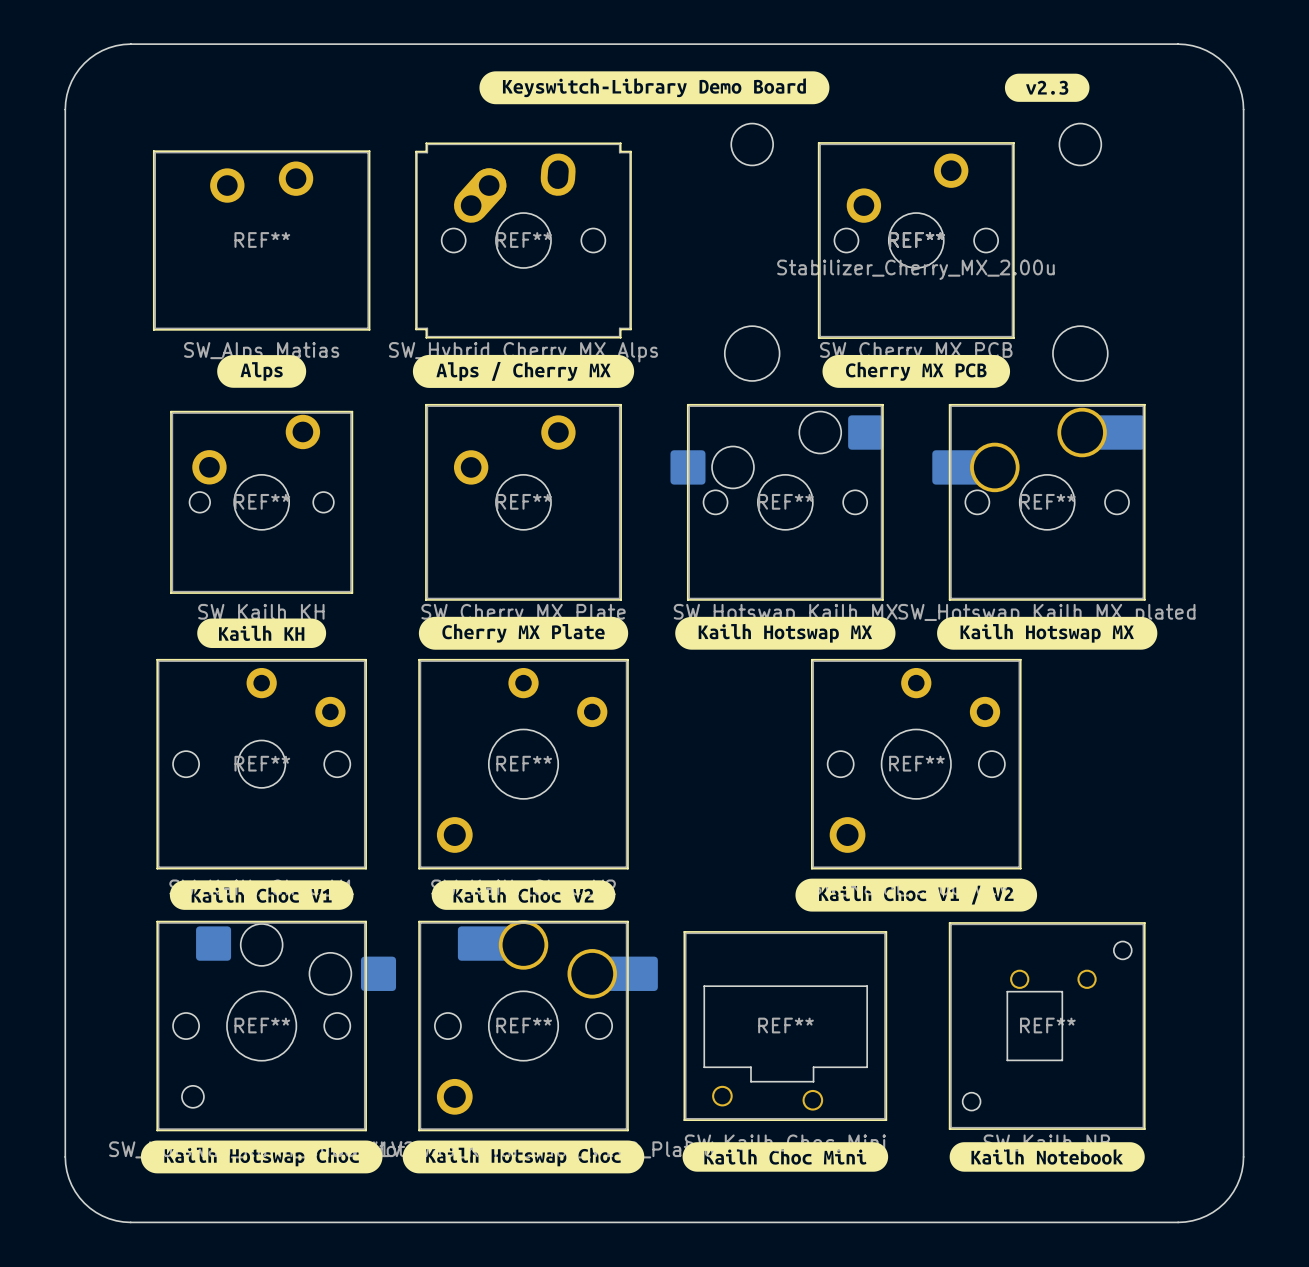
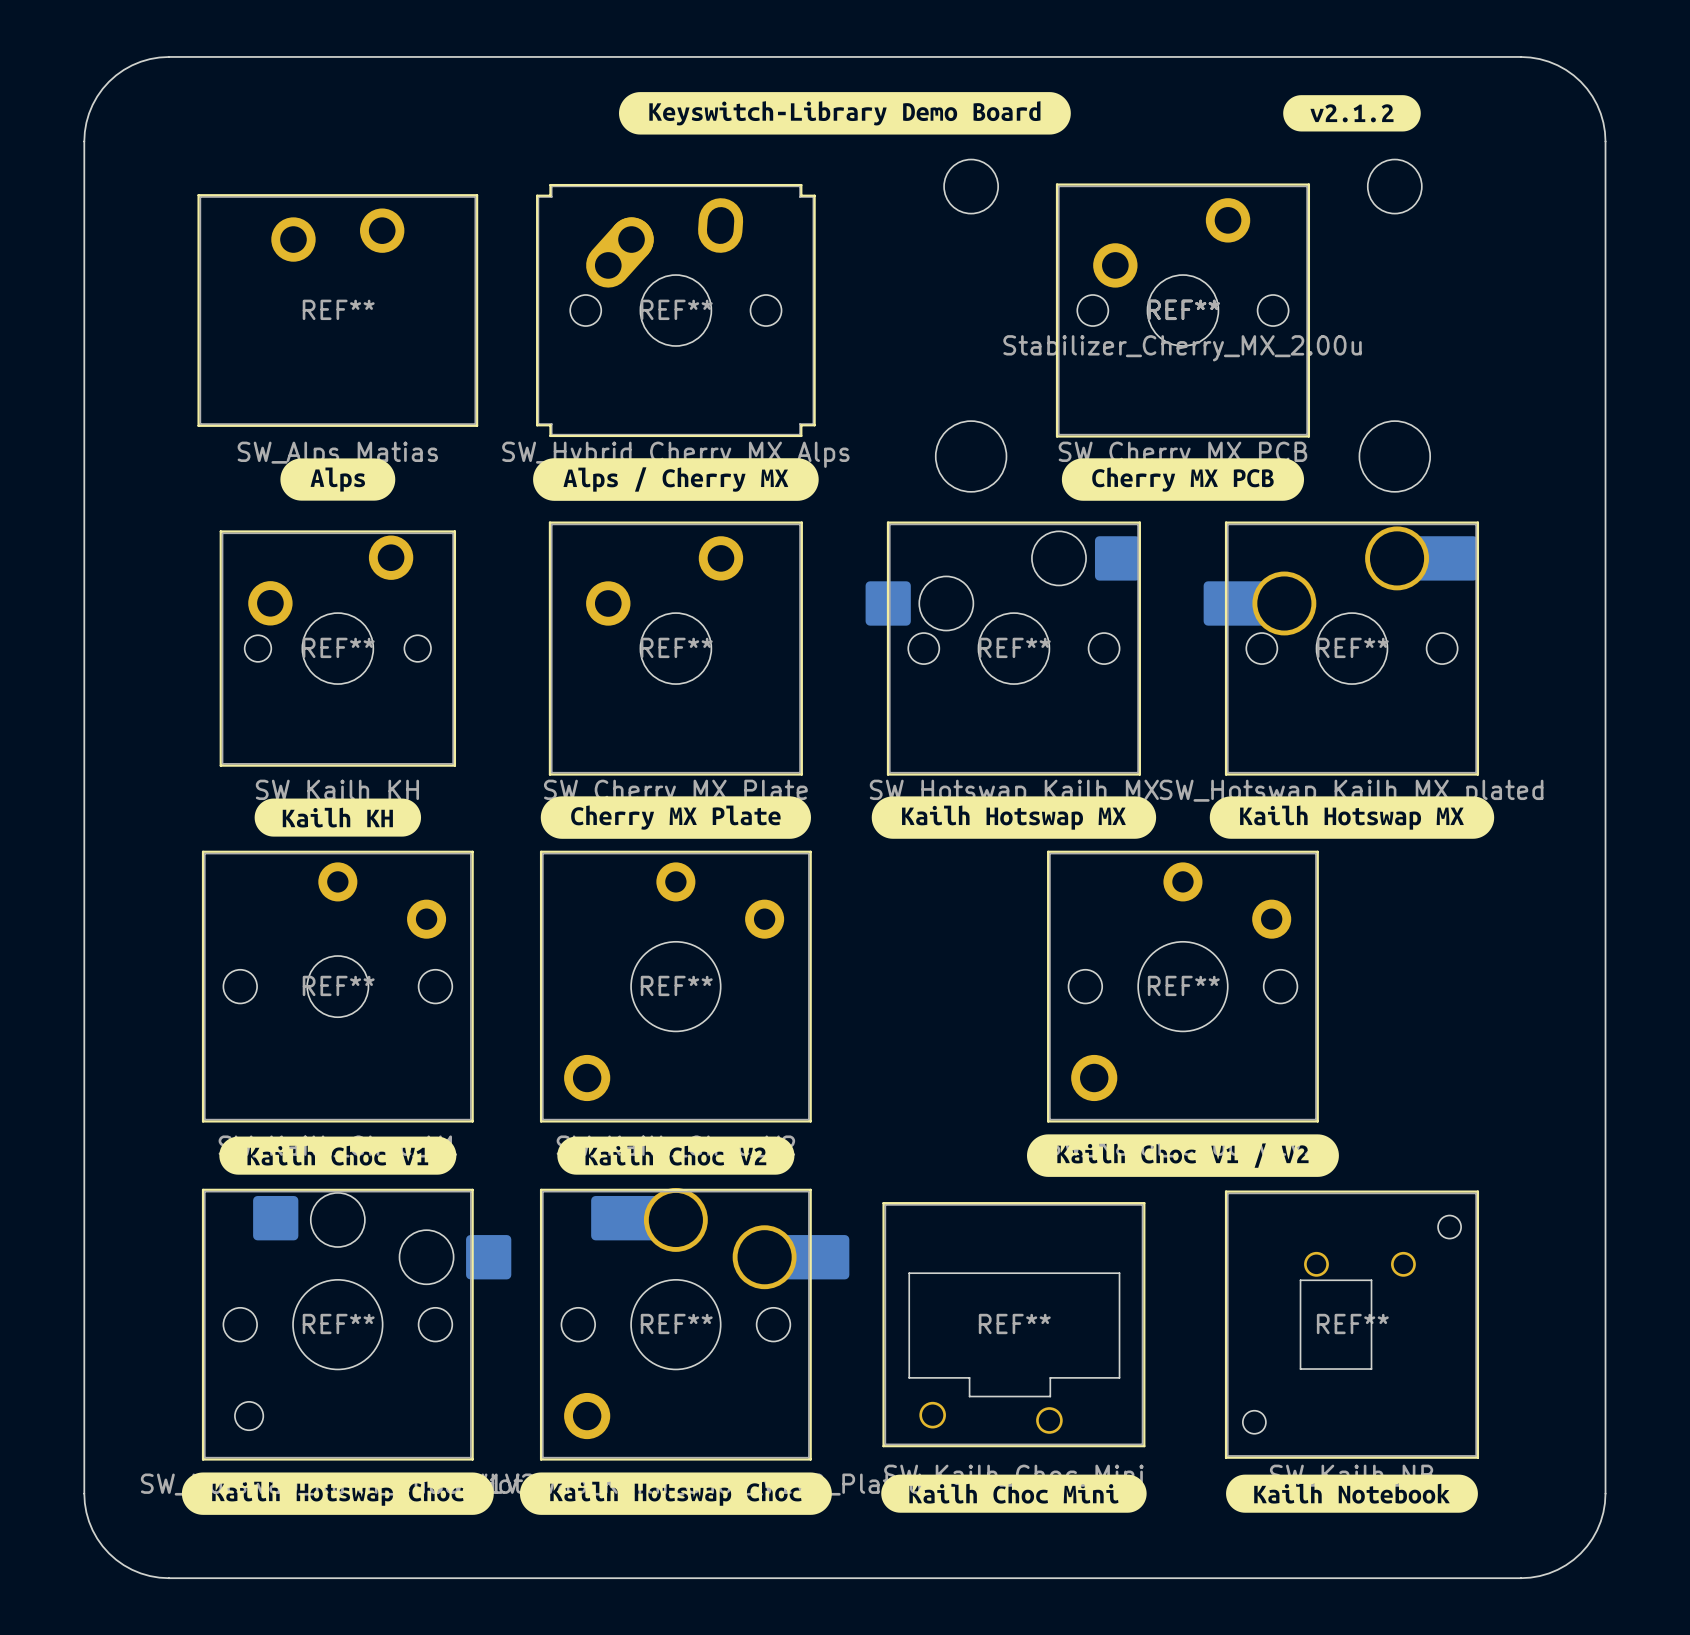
drawing shape: [1004, 73, 1090, 102] -> [1283, 95, 1421, 132]

